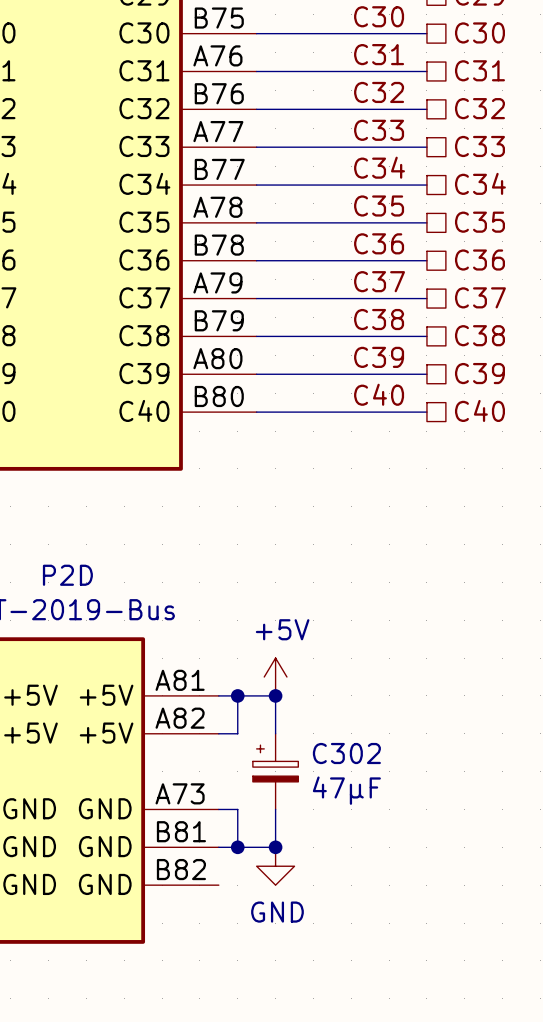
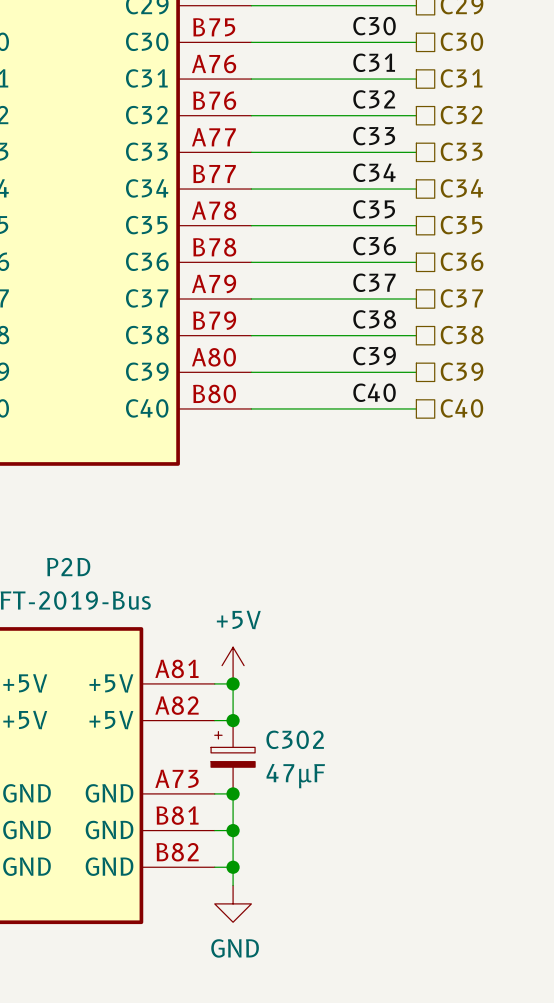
power symbol position: +5V (275, 677) -> +5V (233, 665)
wire: (237, 695) (275, 695) (275, 733) -> none
junction position: (275, 695) -> (233, 720)
C302 position: (275, 771) -> (233, 757)
junction: none -> (233, 793)
wire: (275, 809) (275, 847) (237, 847) -> (233, 885) (233, 830)
junction: (275, 847) -> none
power symbol position: GND (275, 866) -> GND (233, 903)
wire: none -> (214, 867) (233, 867)
junction: none -> (233, 867)

